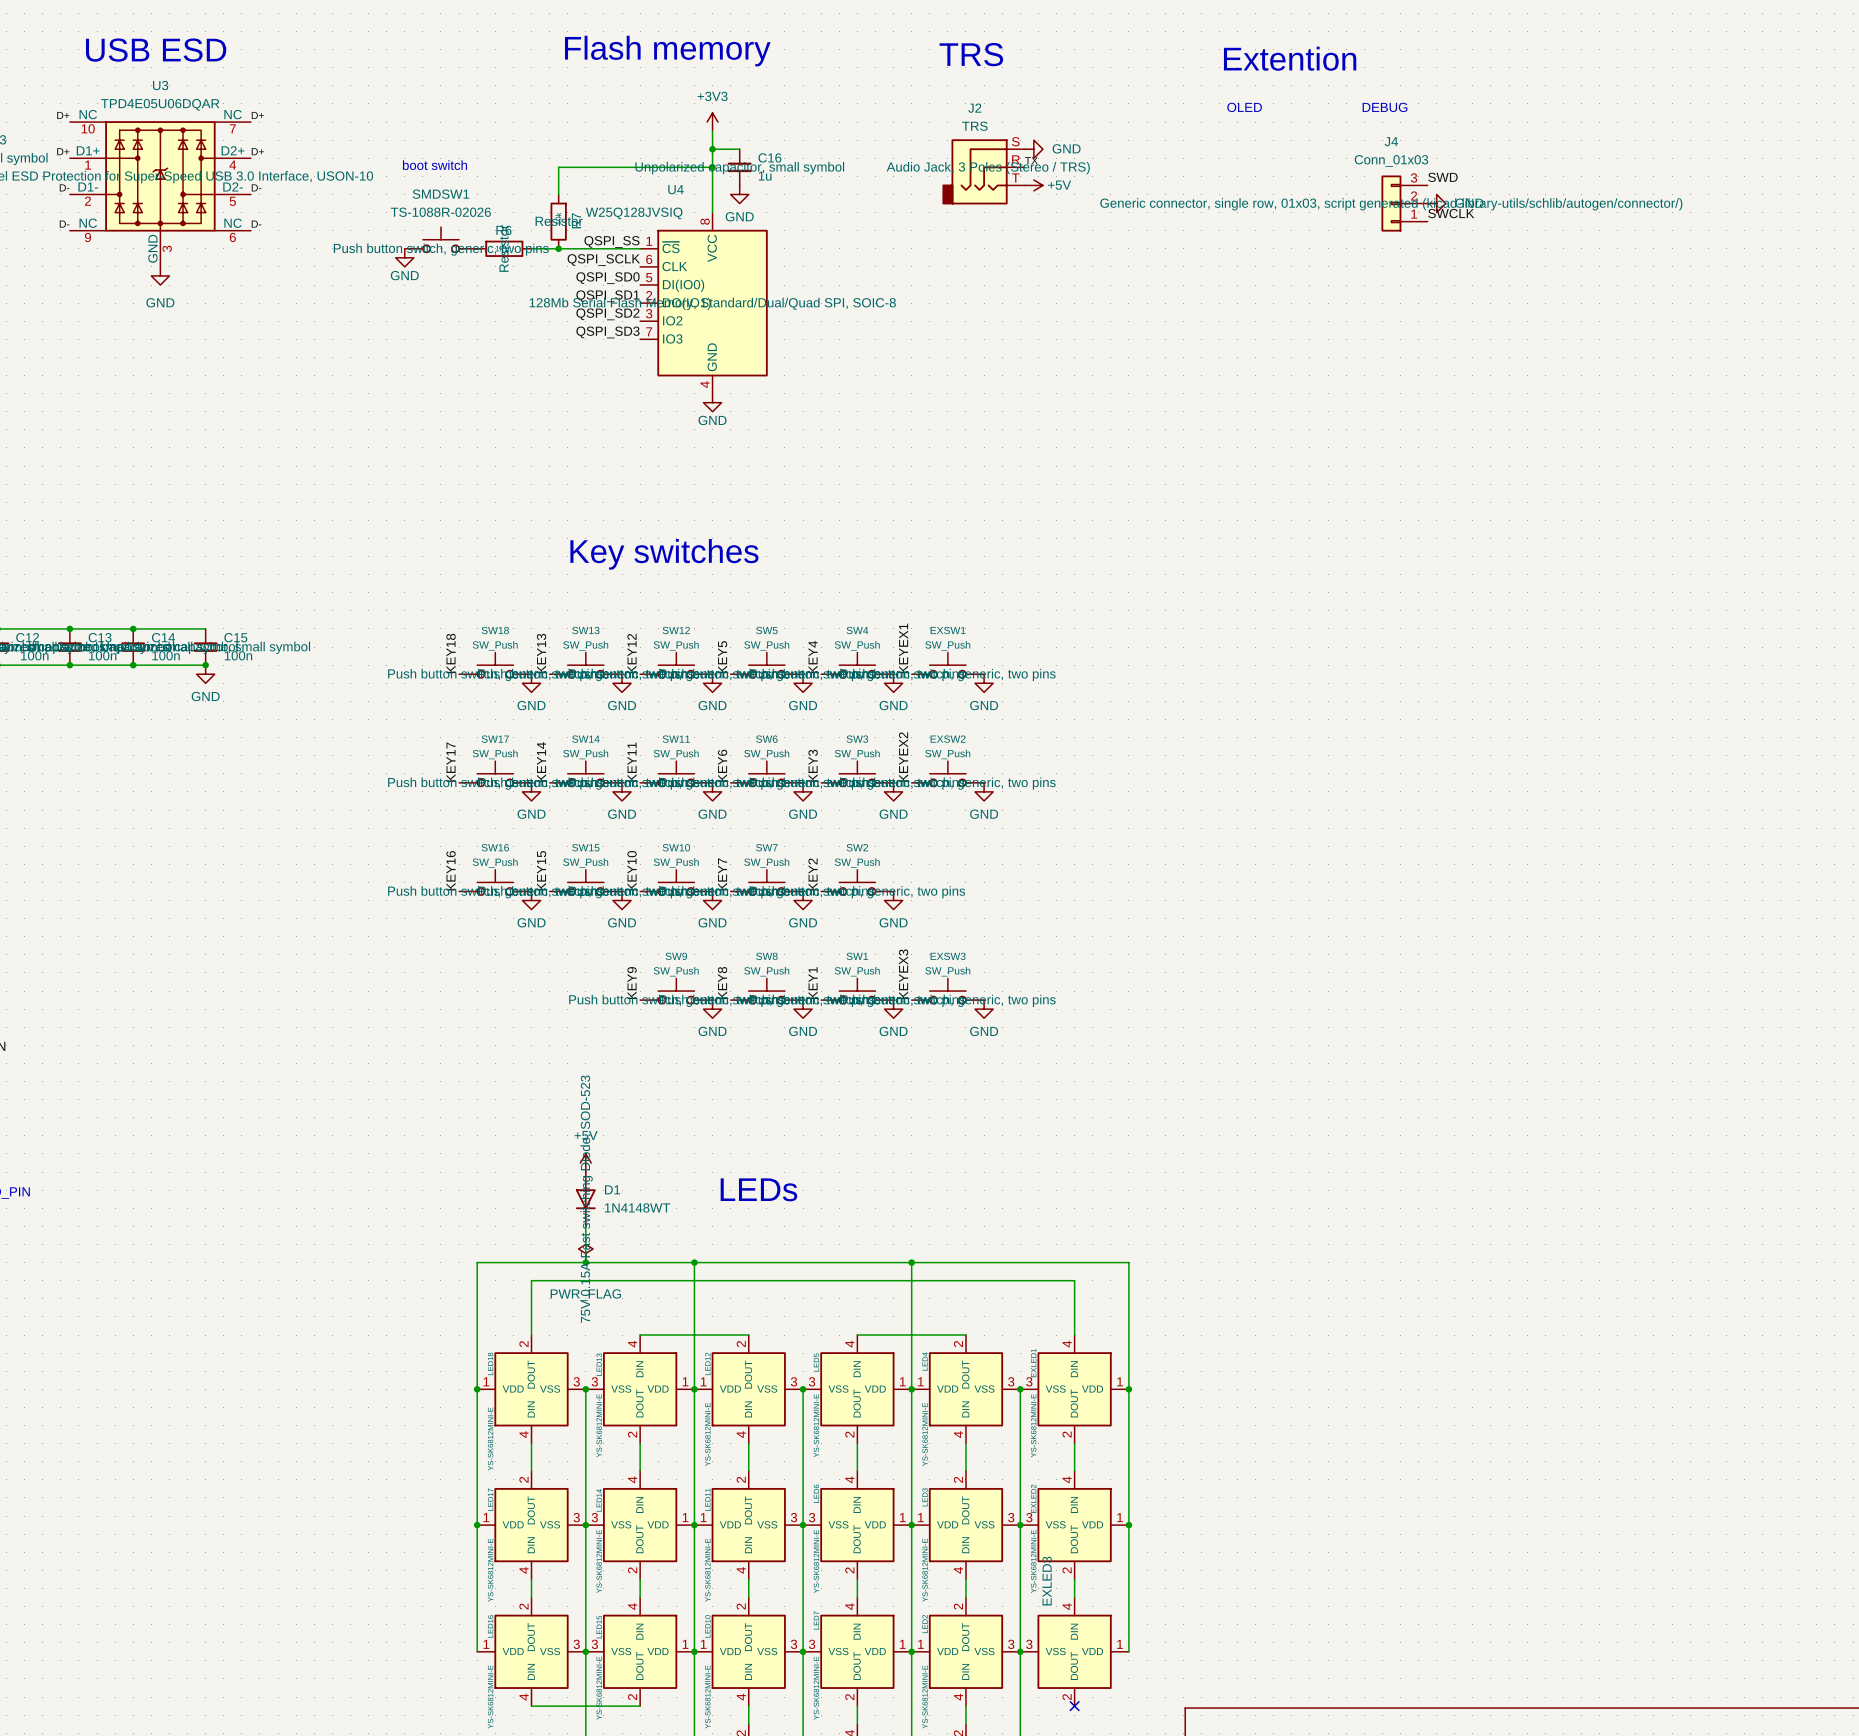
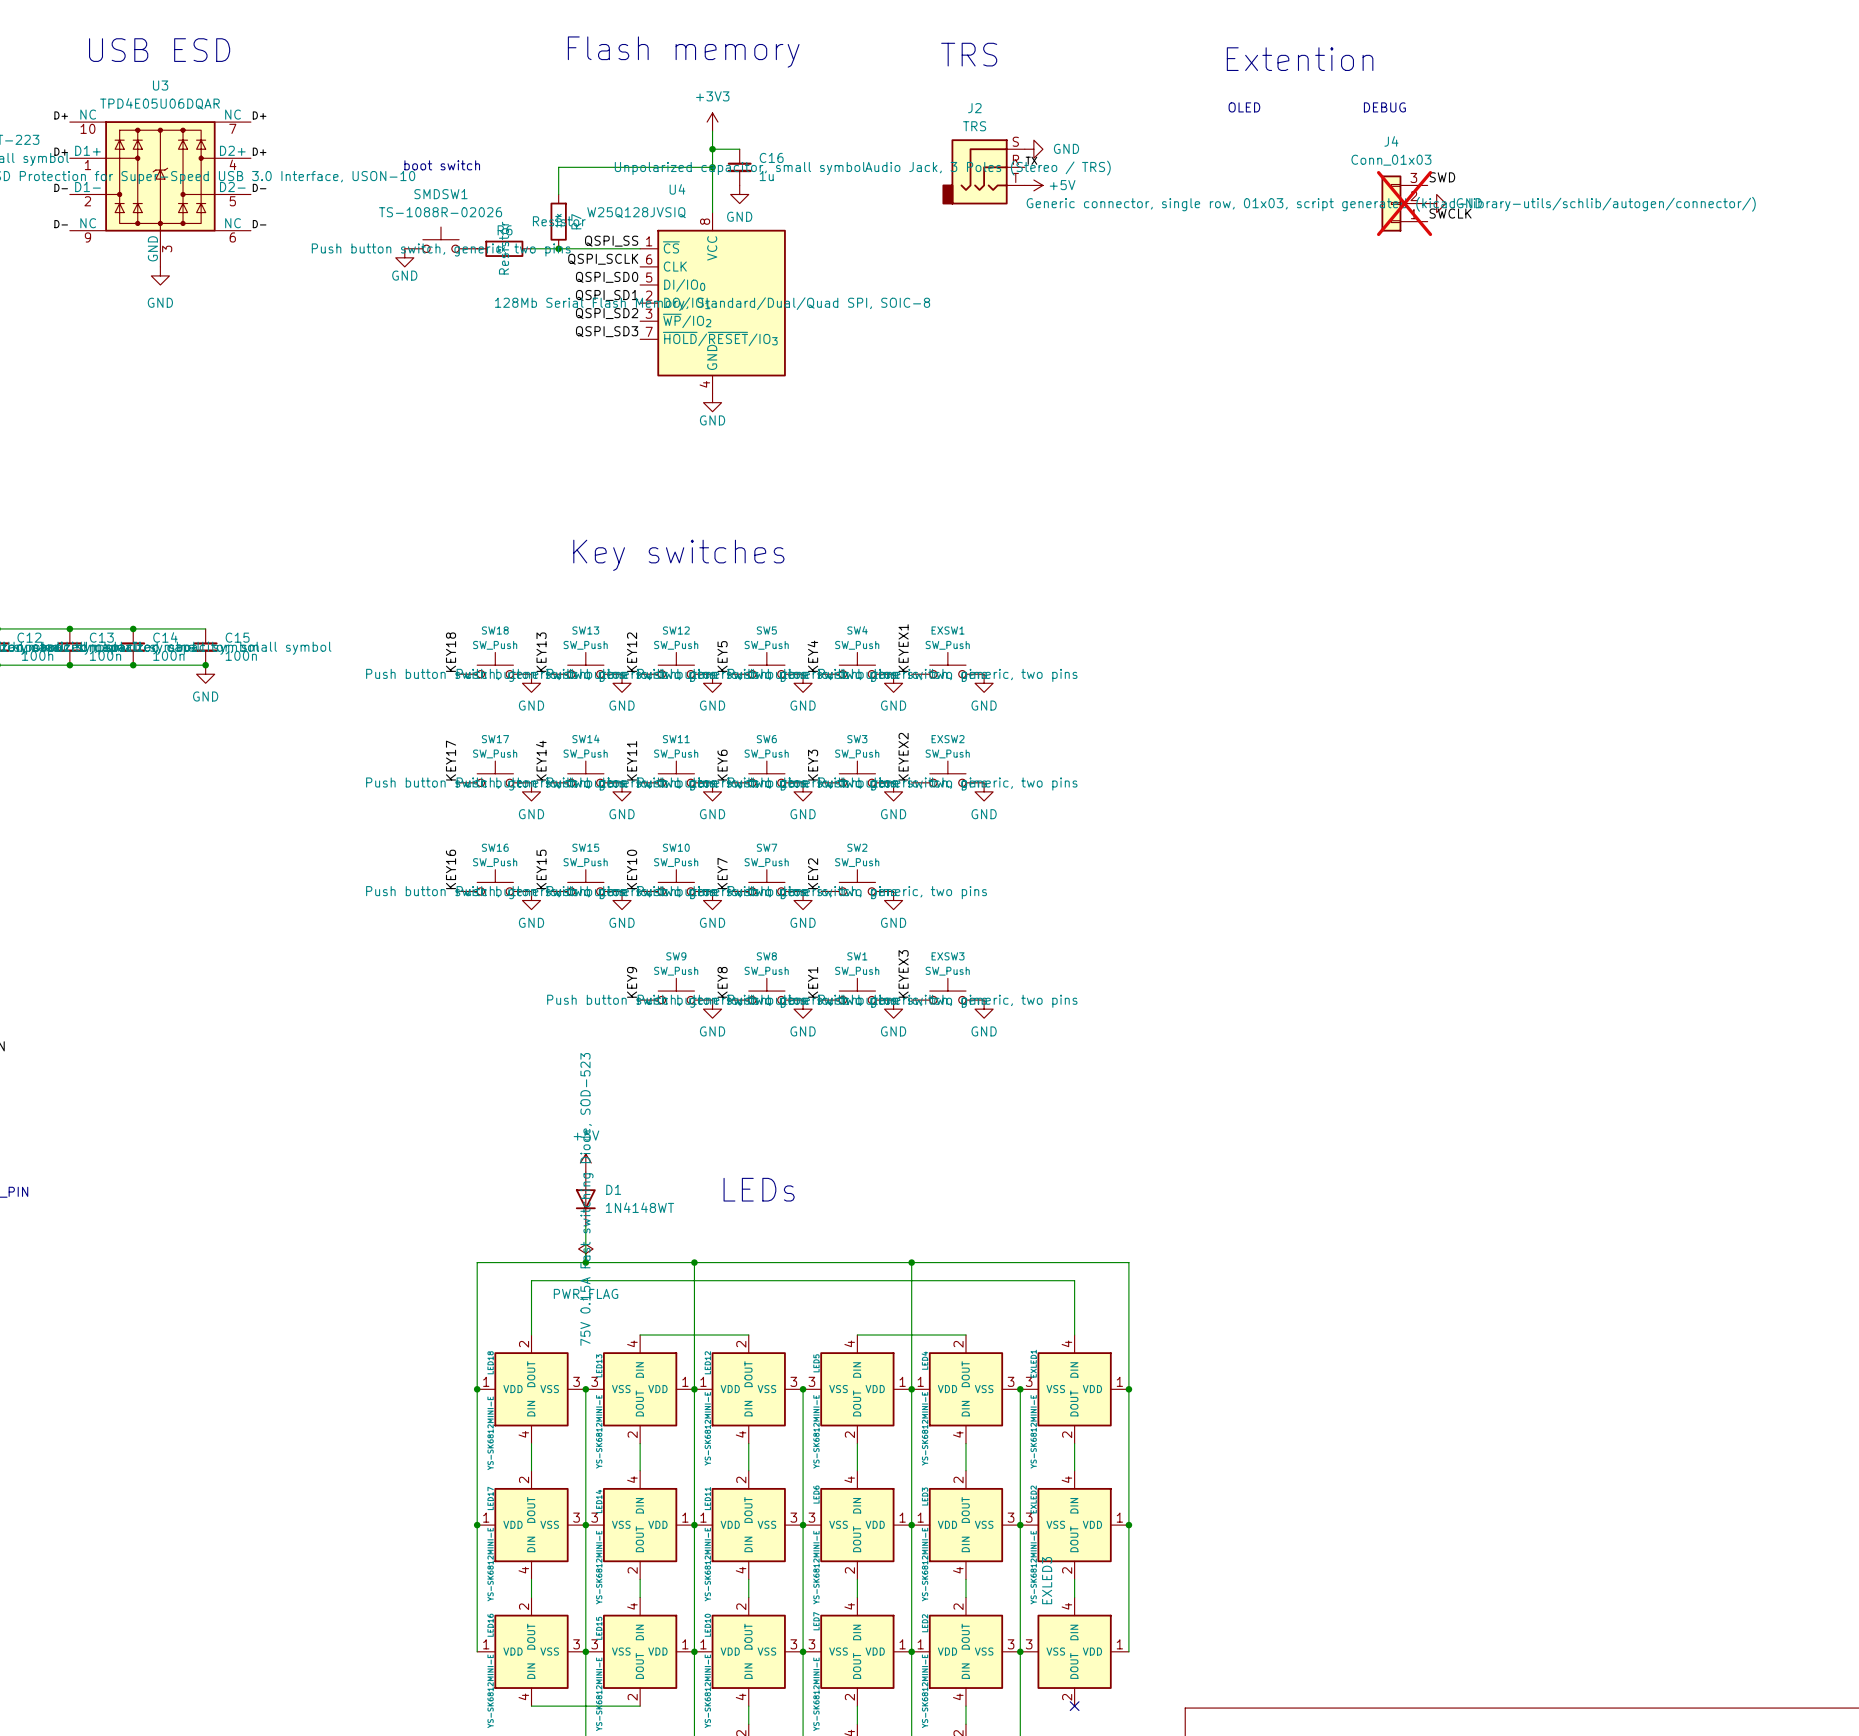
J4 do-not-place cross: none -> (1404, 203)
U4 symbol: [640, 212, 768, 394] -> [640, 212, 786, 394]

